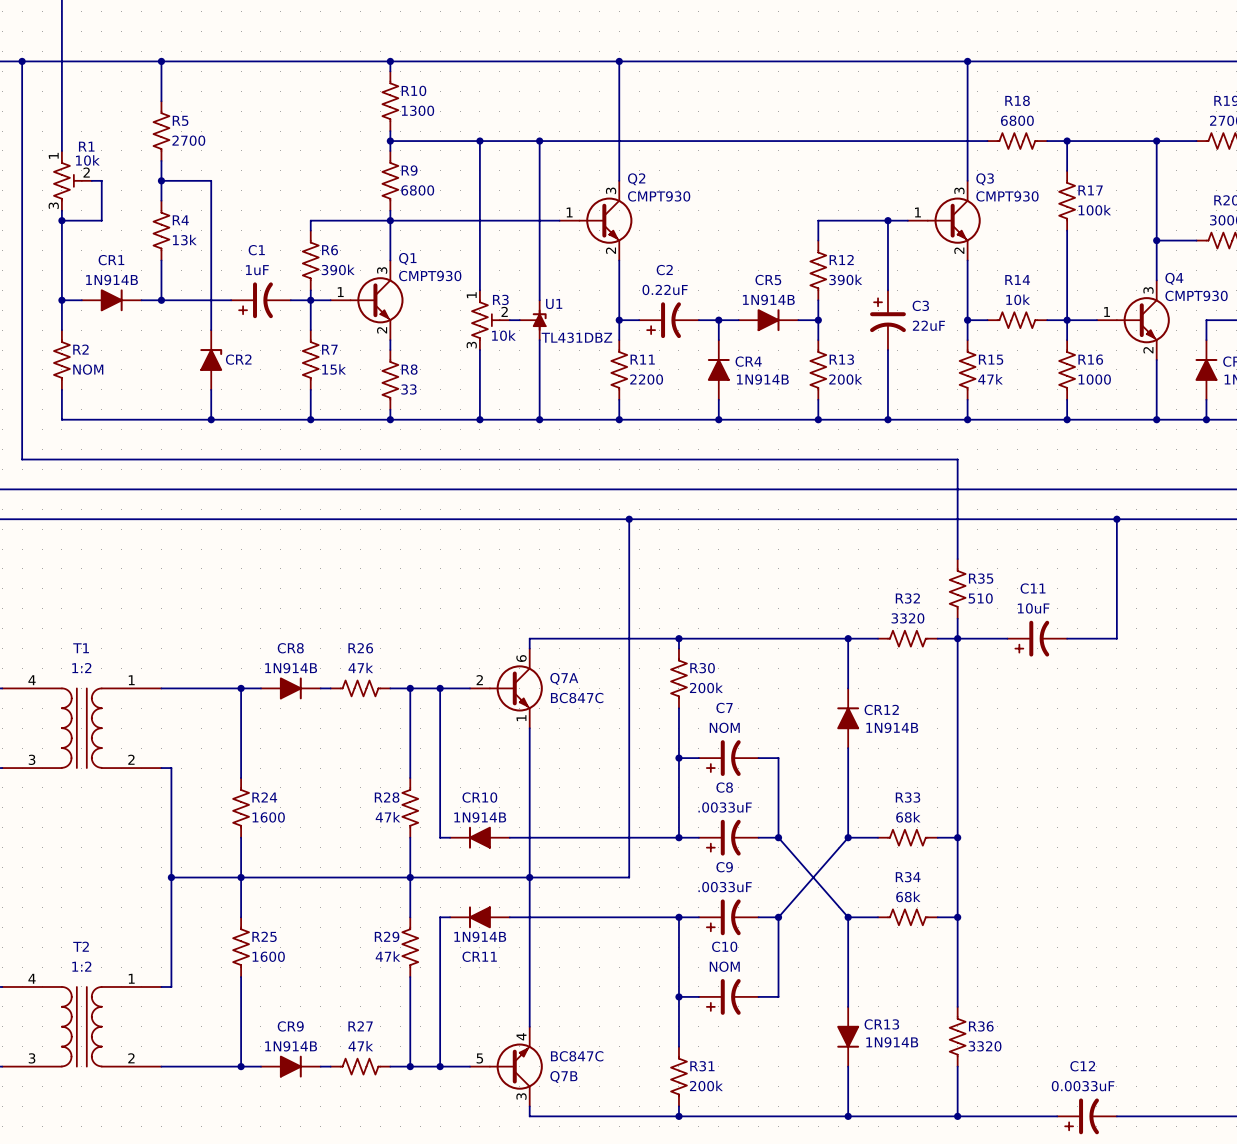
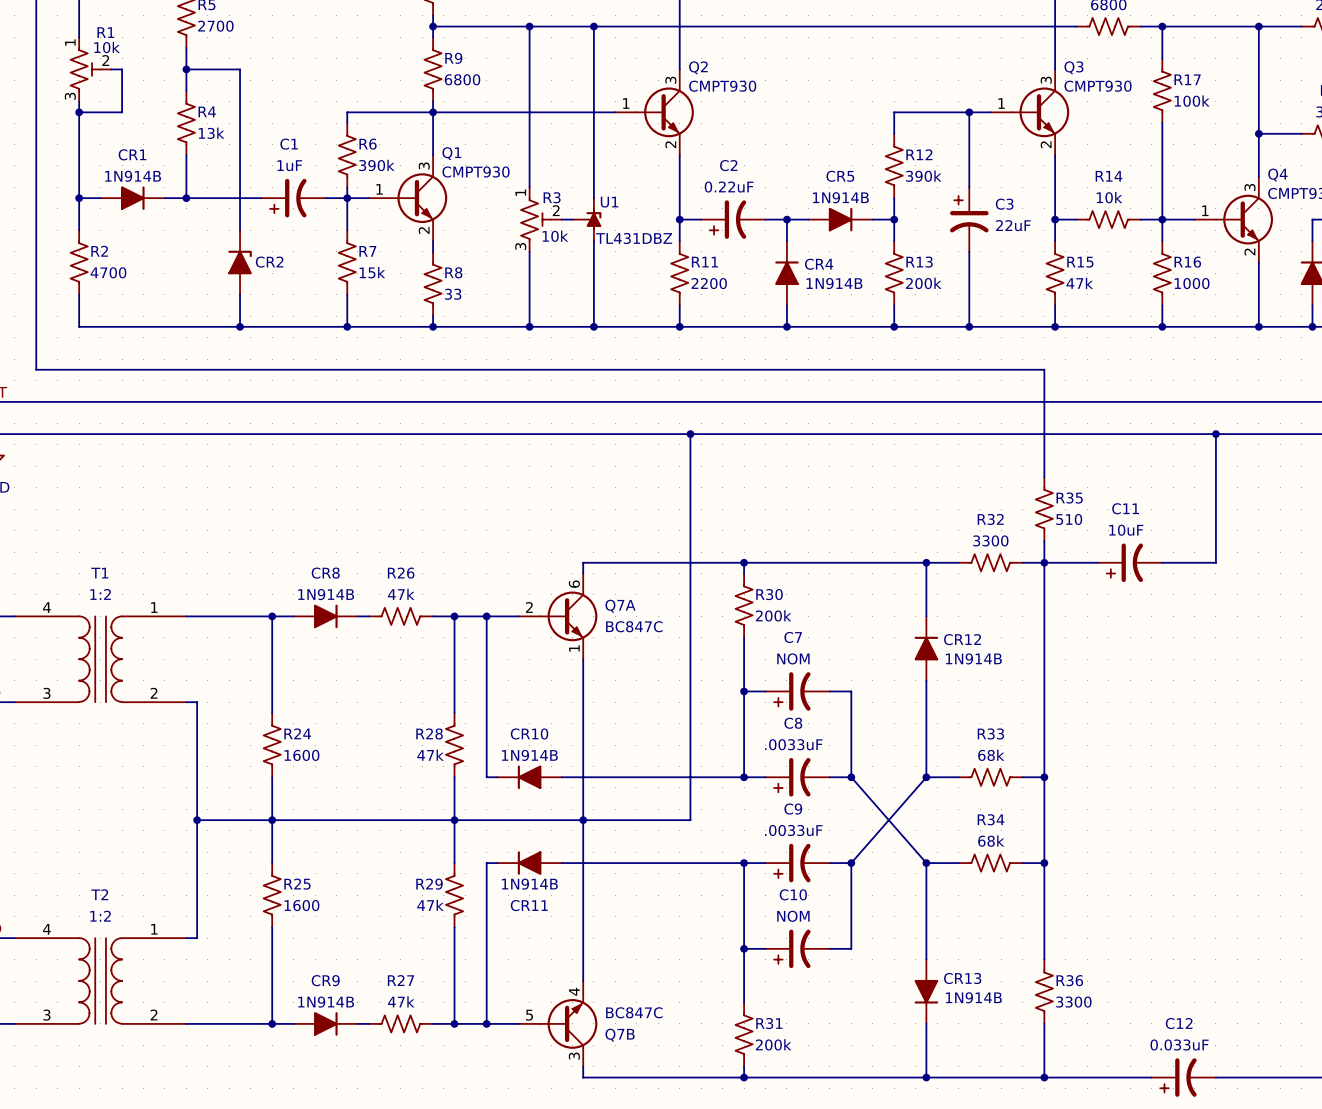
R2 value: NOM (88, 369) -> 4700 (108, 272)
R32 value: 3320 (907, 618) -> 3300 (990, 540)
R36 value: 3320 (985, 1046) -> 3300 (1073, 1002)
C12 value: 0.0033uF (1083, 1086) -> 0.033uF (1179, 1044)

